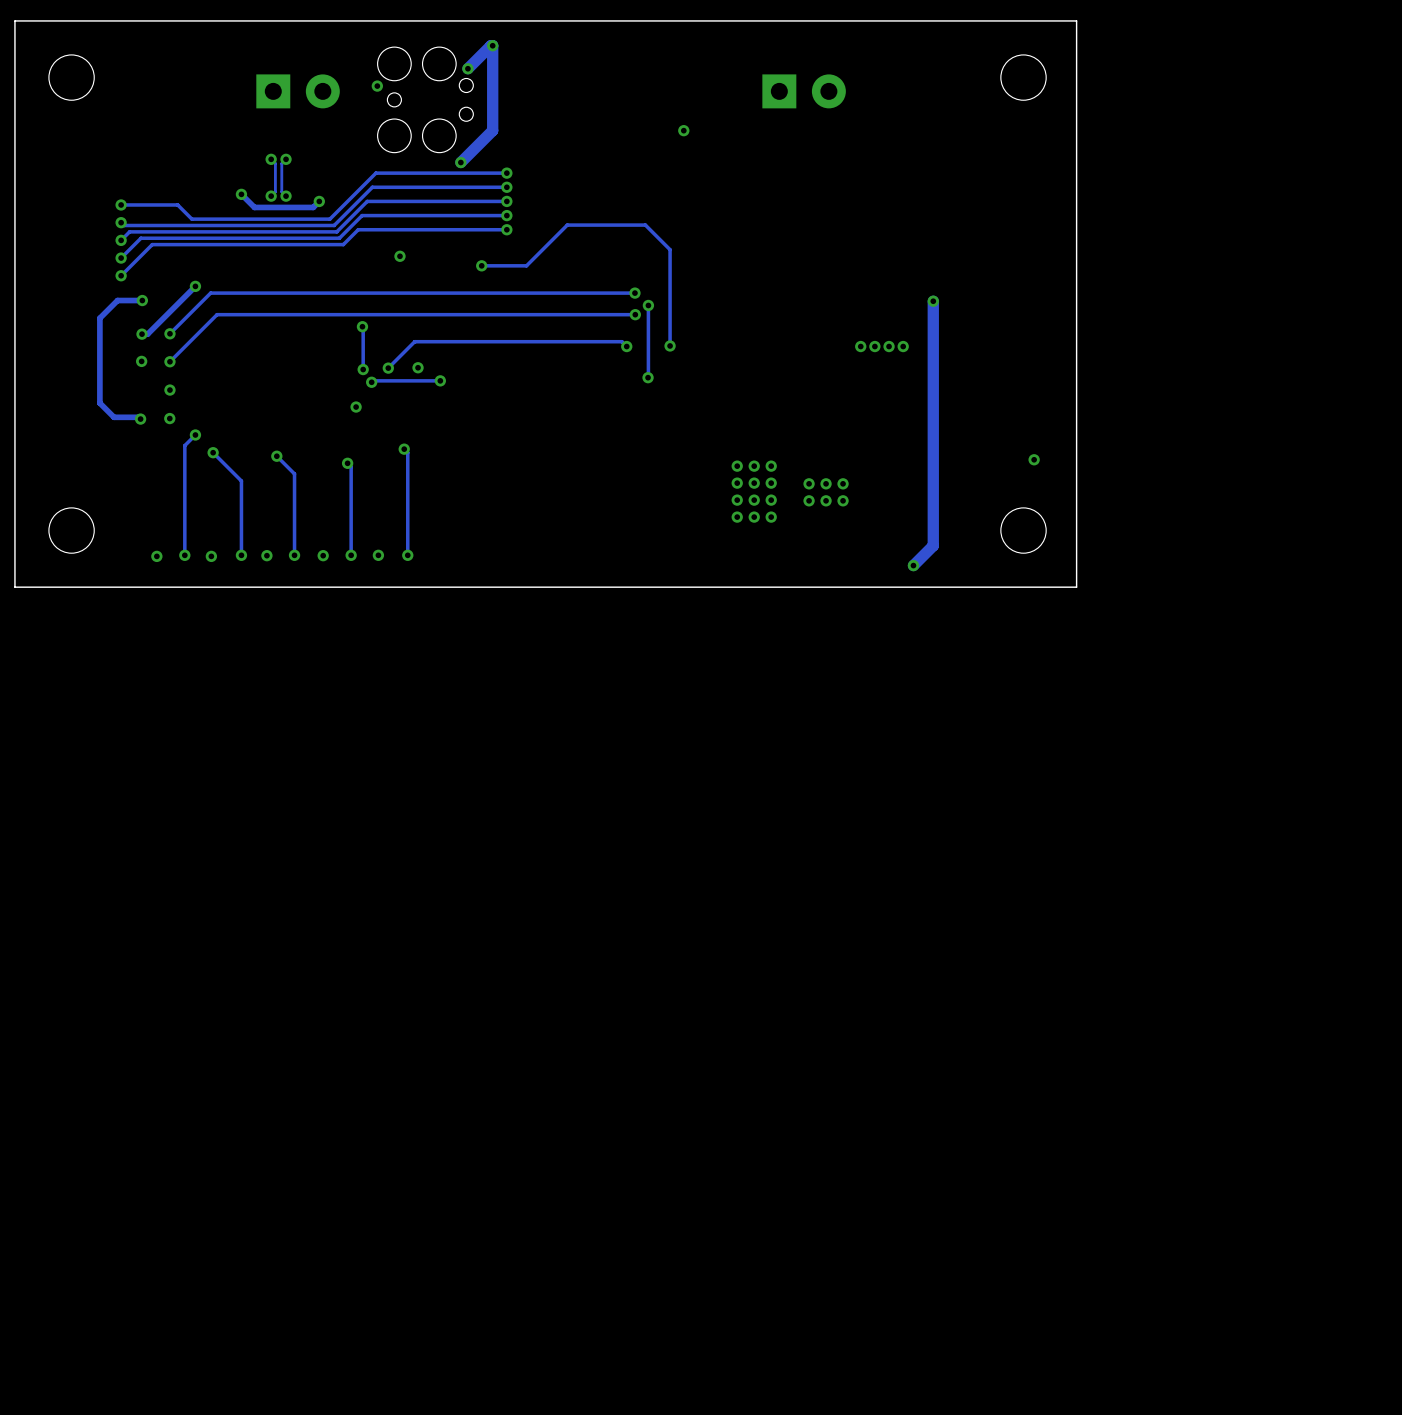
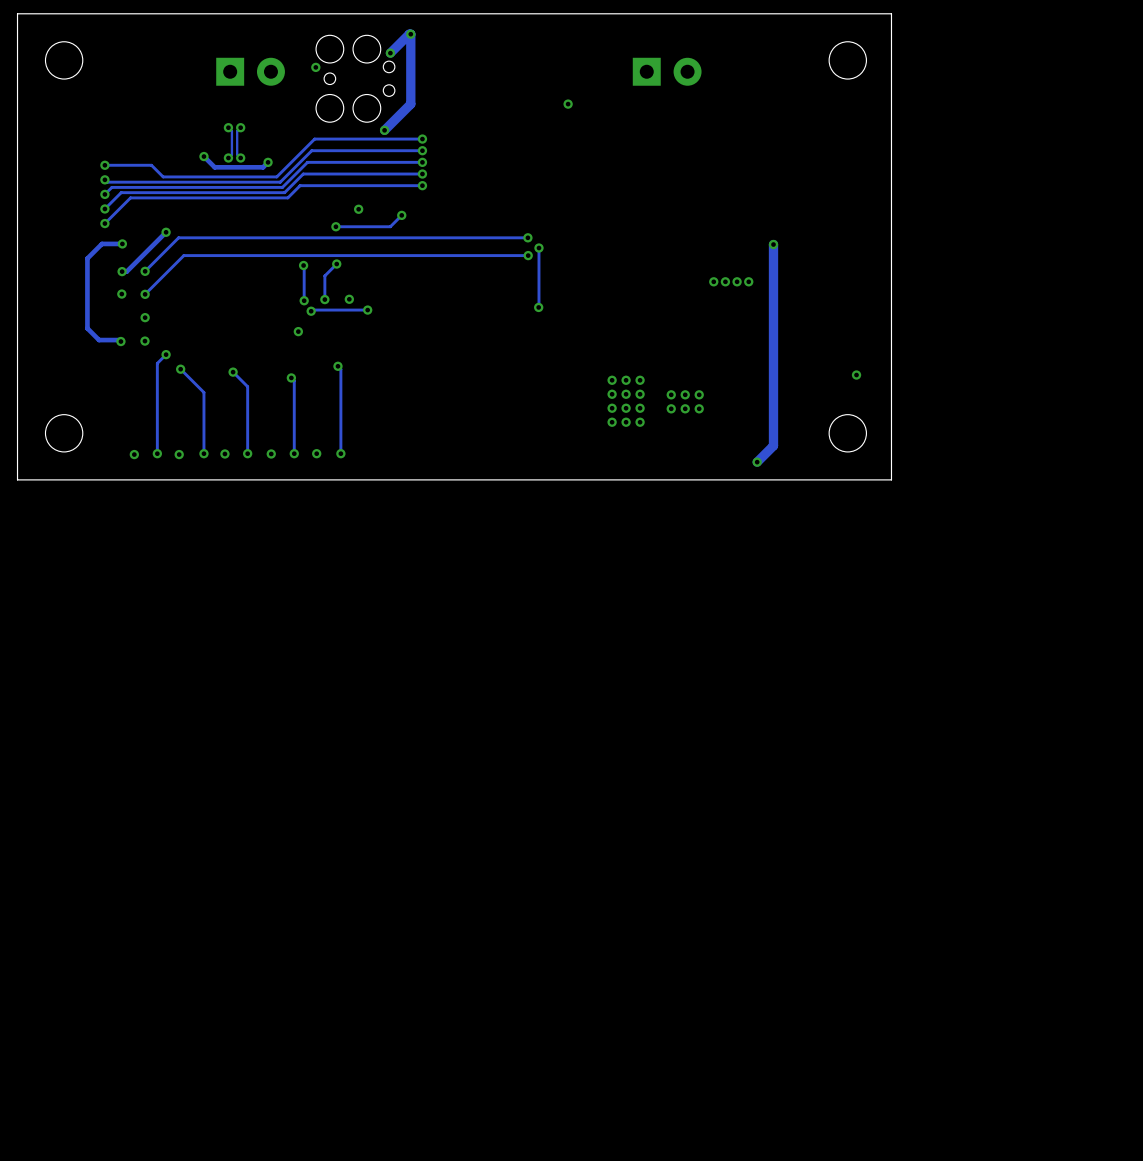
via: (399, 256) -> none
via: none -> (358, 209)
track: (481, 265) (526, 265) (567, 225) (645, 225) (670, 249) (670, 345) -> (401, 215) (390, 226) (335, 226)
via: none -> (335, 226)
via: none -> (336, 264)
via: (670, 345) -> none
track: (626, 346) (621, 341) (414, 341) (388, 368) -> (336, 264) (324, 275) (324, 299)
via: (626, 346) -> none

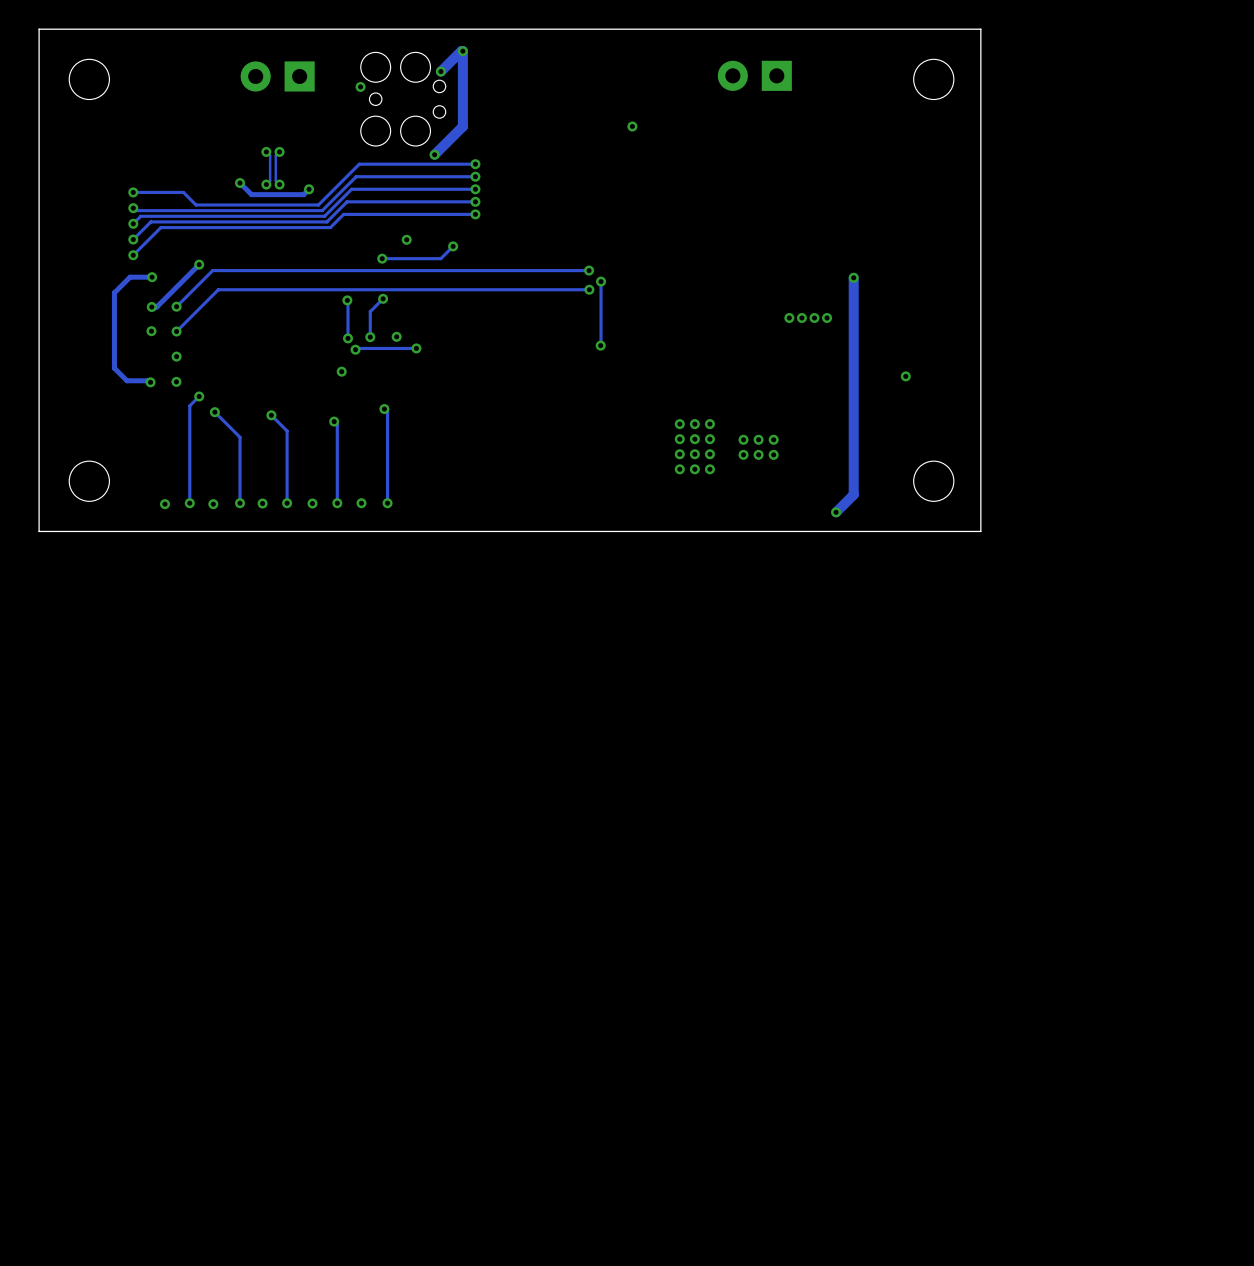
part rotation: 0° (250, 71) -> 180° (277, 76)
part rotation: 0° (667, 71) -> 180° (754, 75)
via position: (856, 375) -> (905, 376)

